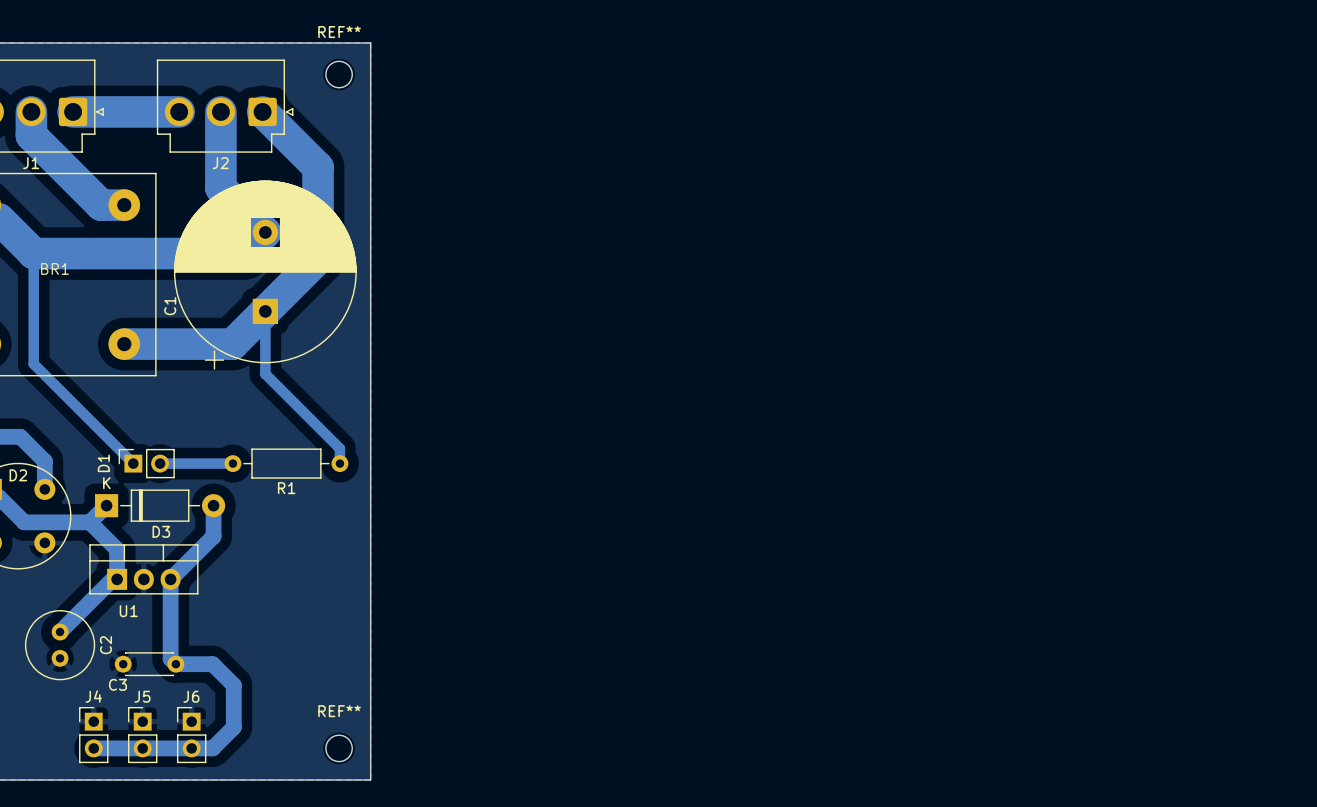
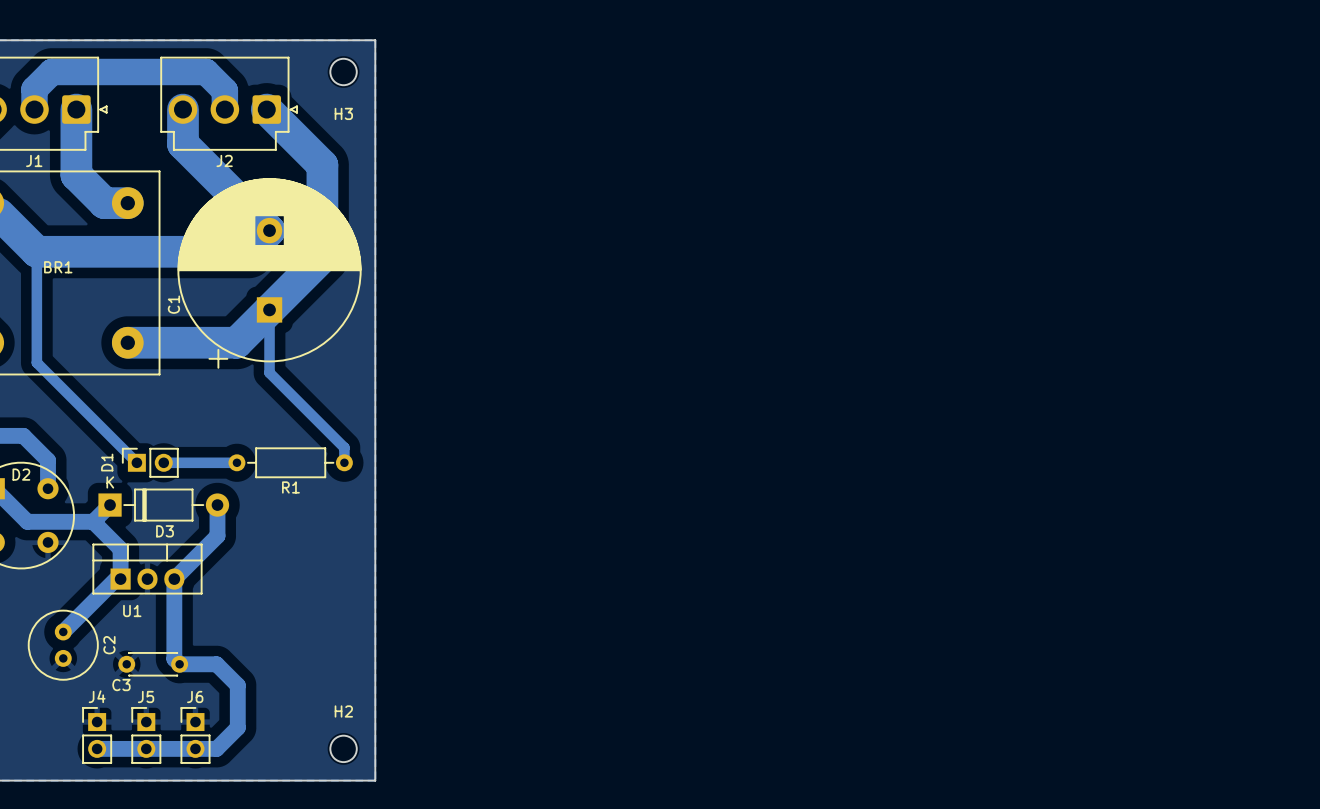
REF** name: REF** (339, 32) -> H3 (343, 113)
bottom track: (31, 111) (31, 135) (73, 177) -> (76, 109) (76, 174)
bottom track: none -> (34, 109) (34, 89) (51, 72) (206, 72) (224, 90) (224, 109)
bottom track: (73, 111) (179, 111) -> none
bottom track: (220, 111) (220, 187) -> (182, 109) (182, 144) (224, 185)
REF** name: REF** (339, 711) -> H2 (343, 711)

